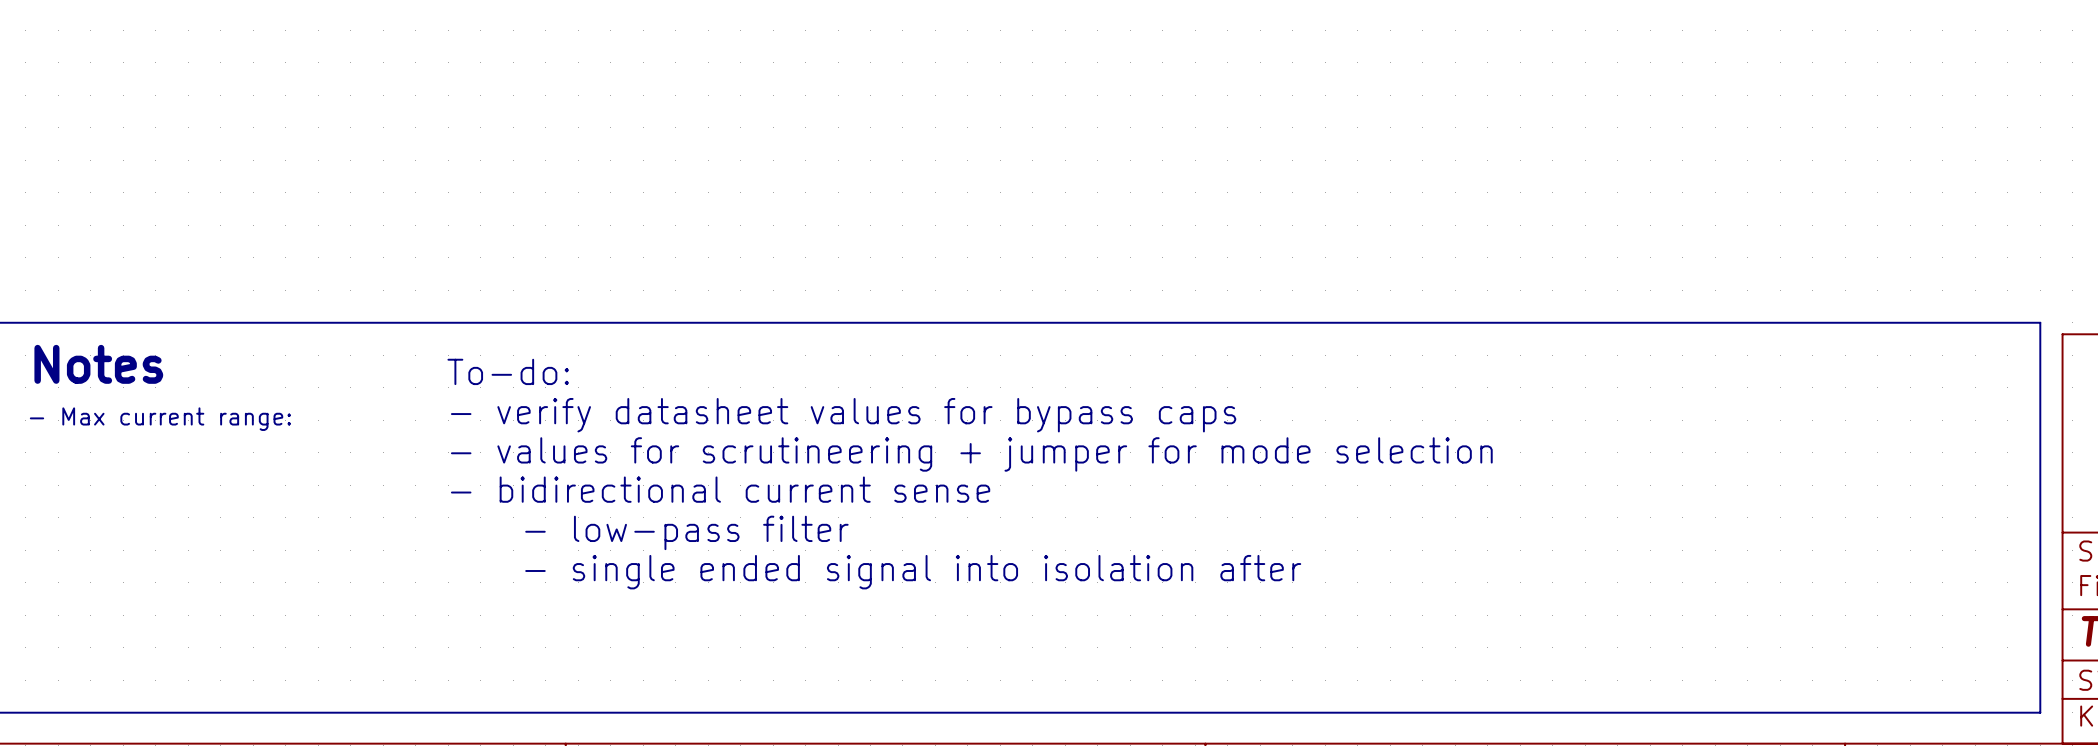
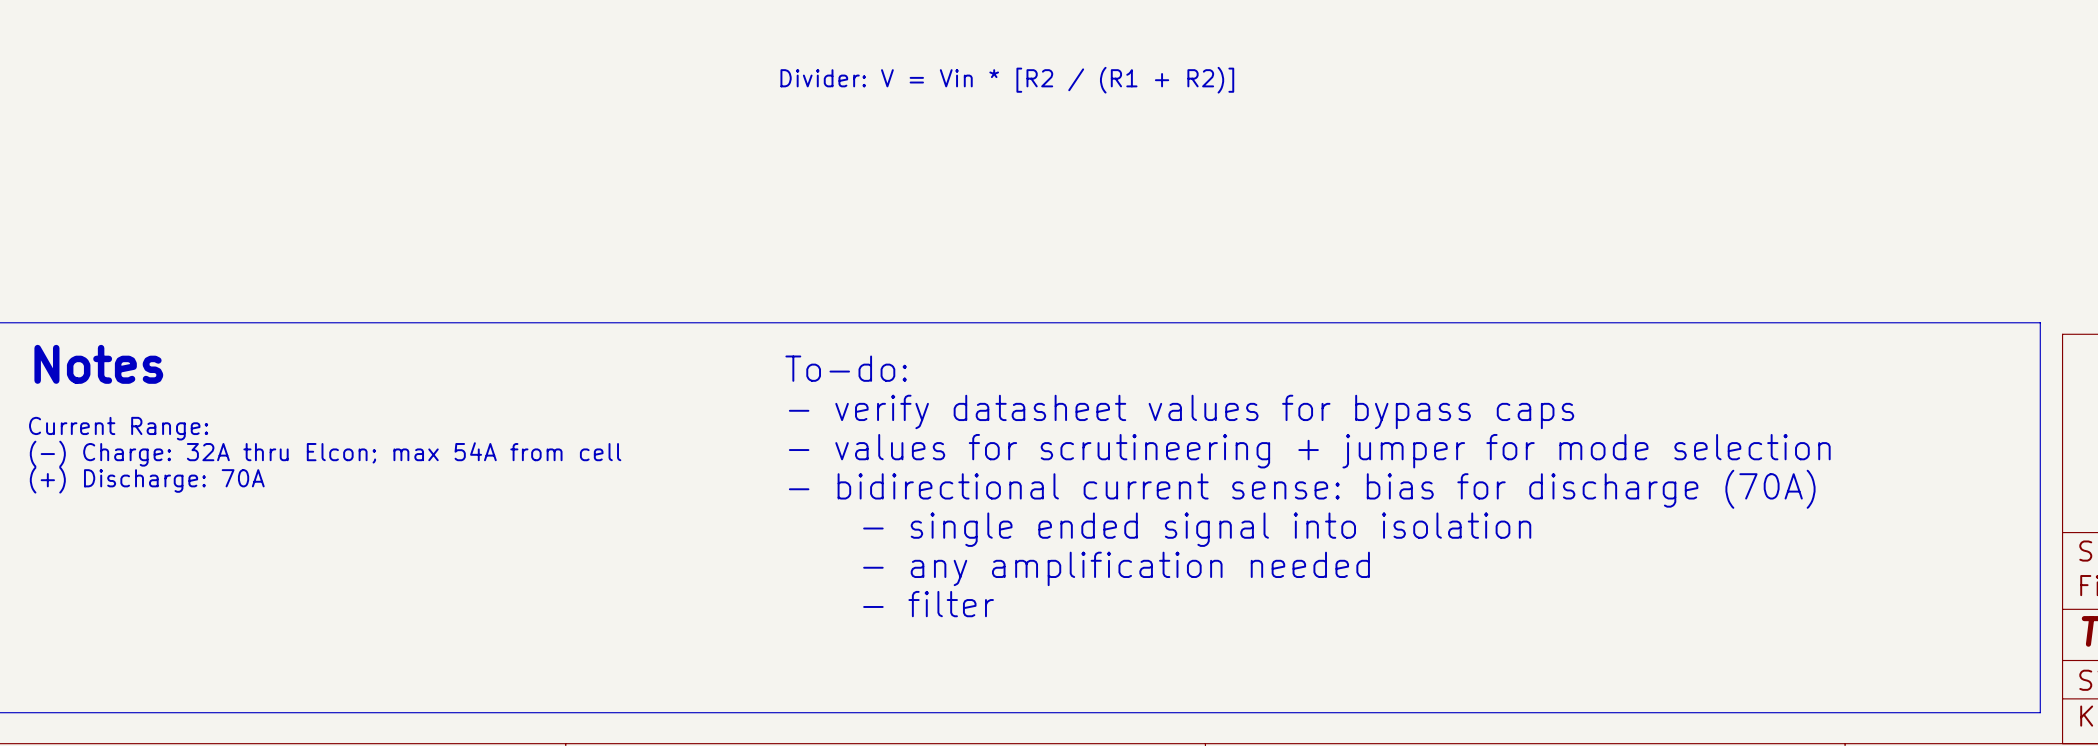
text: none -> Divider: V = Vin * [R2 / (R1 + R2)] (1007, 80)
text: none -> To-do: (846, 368)
text: To-do: (508, 371) -> none
text: none -> - verify datasheet values for bypass caps (1181, 411)
text: - verify datasheet values for bypass caps (843, 415) -> none
text: - Max current range: (160, 419) -> Current Range: (118, 428)
text: none -> - values for scrutineering + jumper for mode selection (1309, 451)
text: none -> (-) Charge: 32A thru Elcon; max 54A from cell (325, 454)
text: - values for scrutineering + jumper for mode selection (971, 454) -> none
text: none -> (+) Discharge: 70A (147, 480)
text: - bidirectional current sense (720, 489) -> none
text: none -> - bidirectional current sense: bias for discharge (70A) (1302, 489)
text: none -> - single ended signal into isolation (1197, 529)
text: - low-pass filter (686, 532) -> none
text: none -> - any amplification needed (1116, 568)
text: - single ended signal into isolation after (913, 572) -> none
text: none -> - filter (928, 604)

